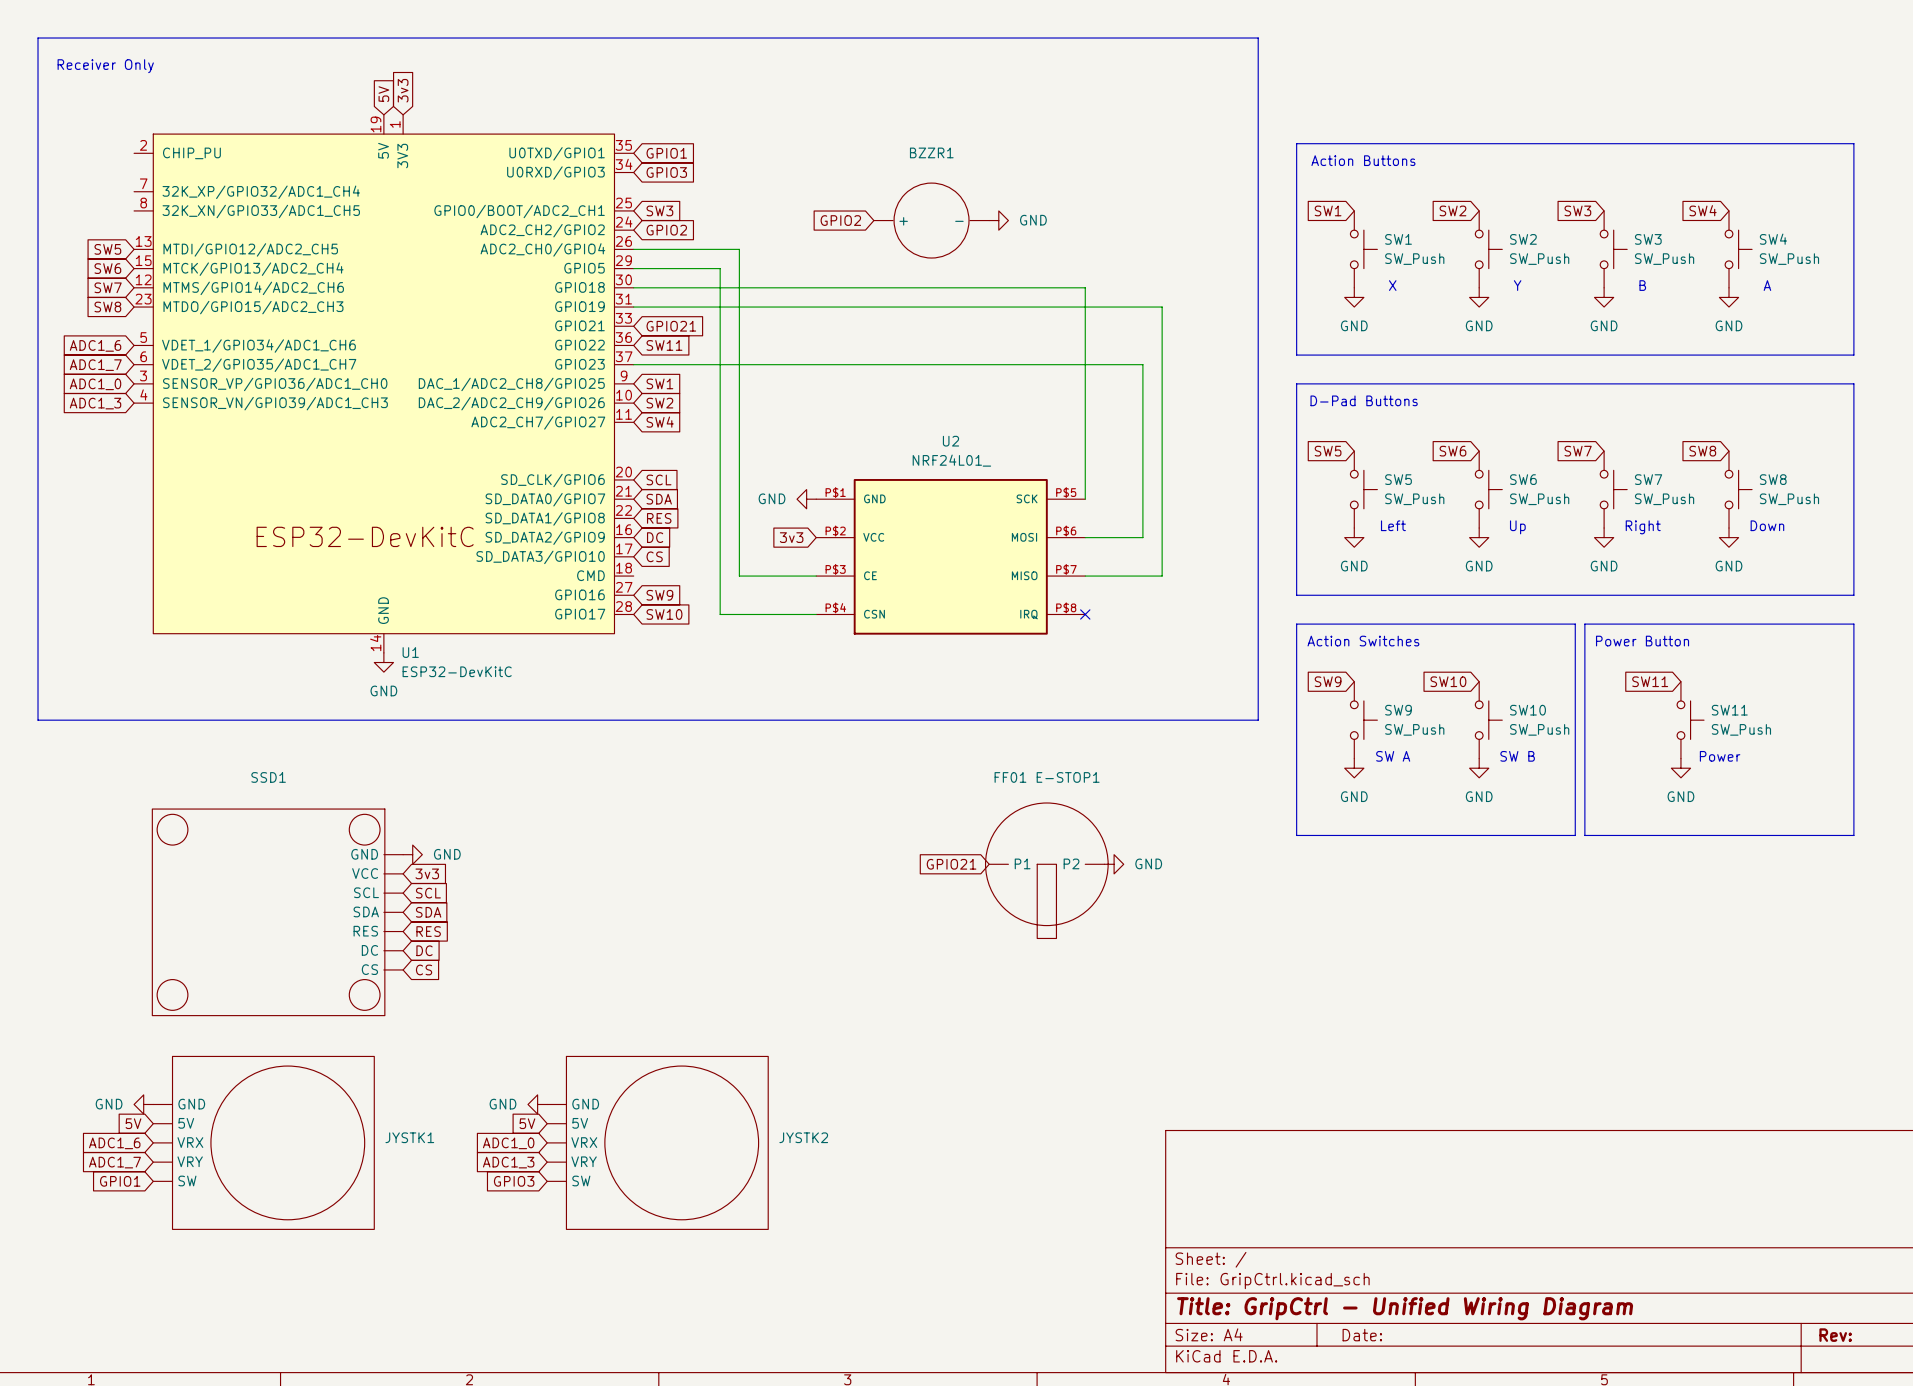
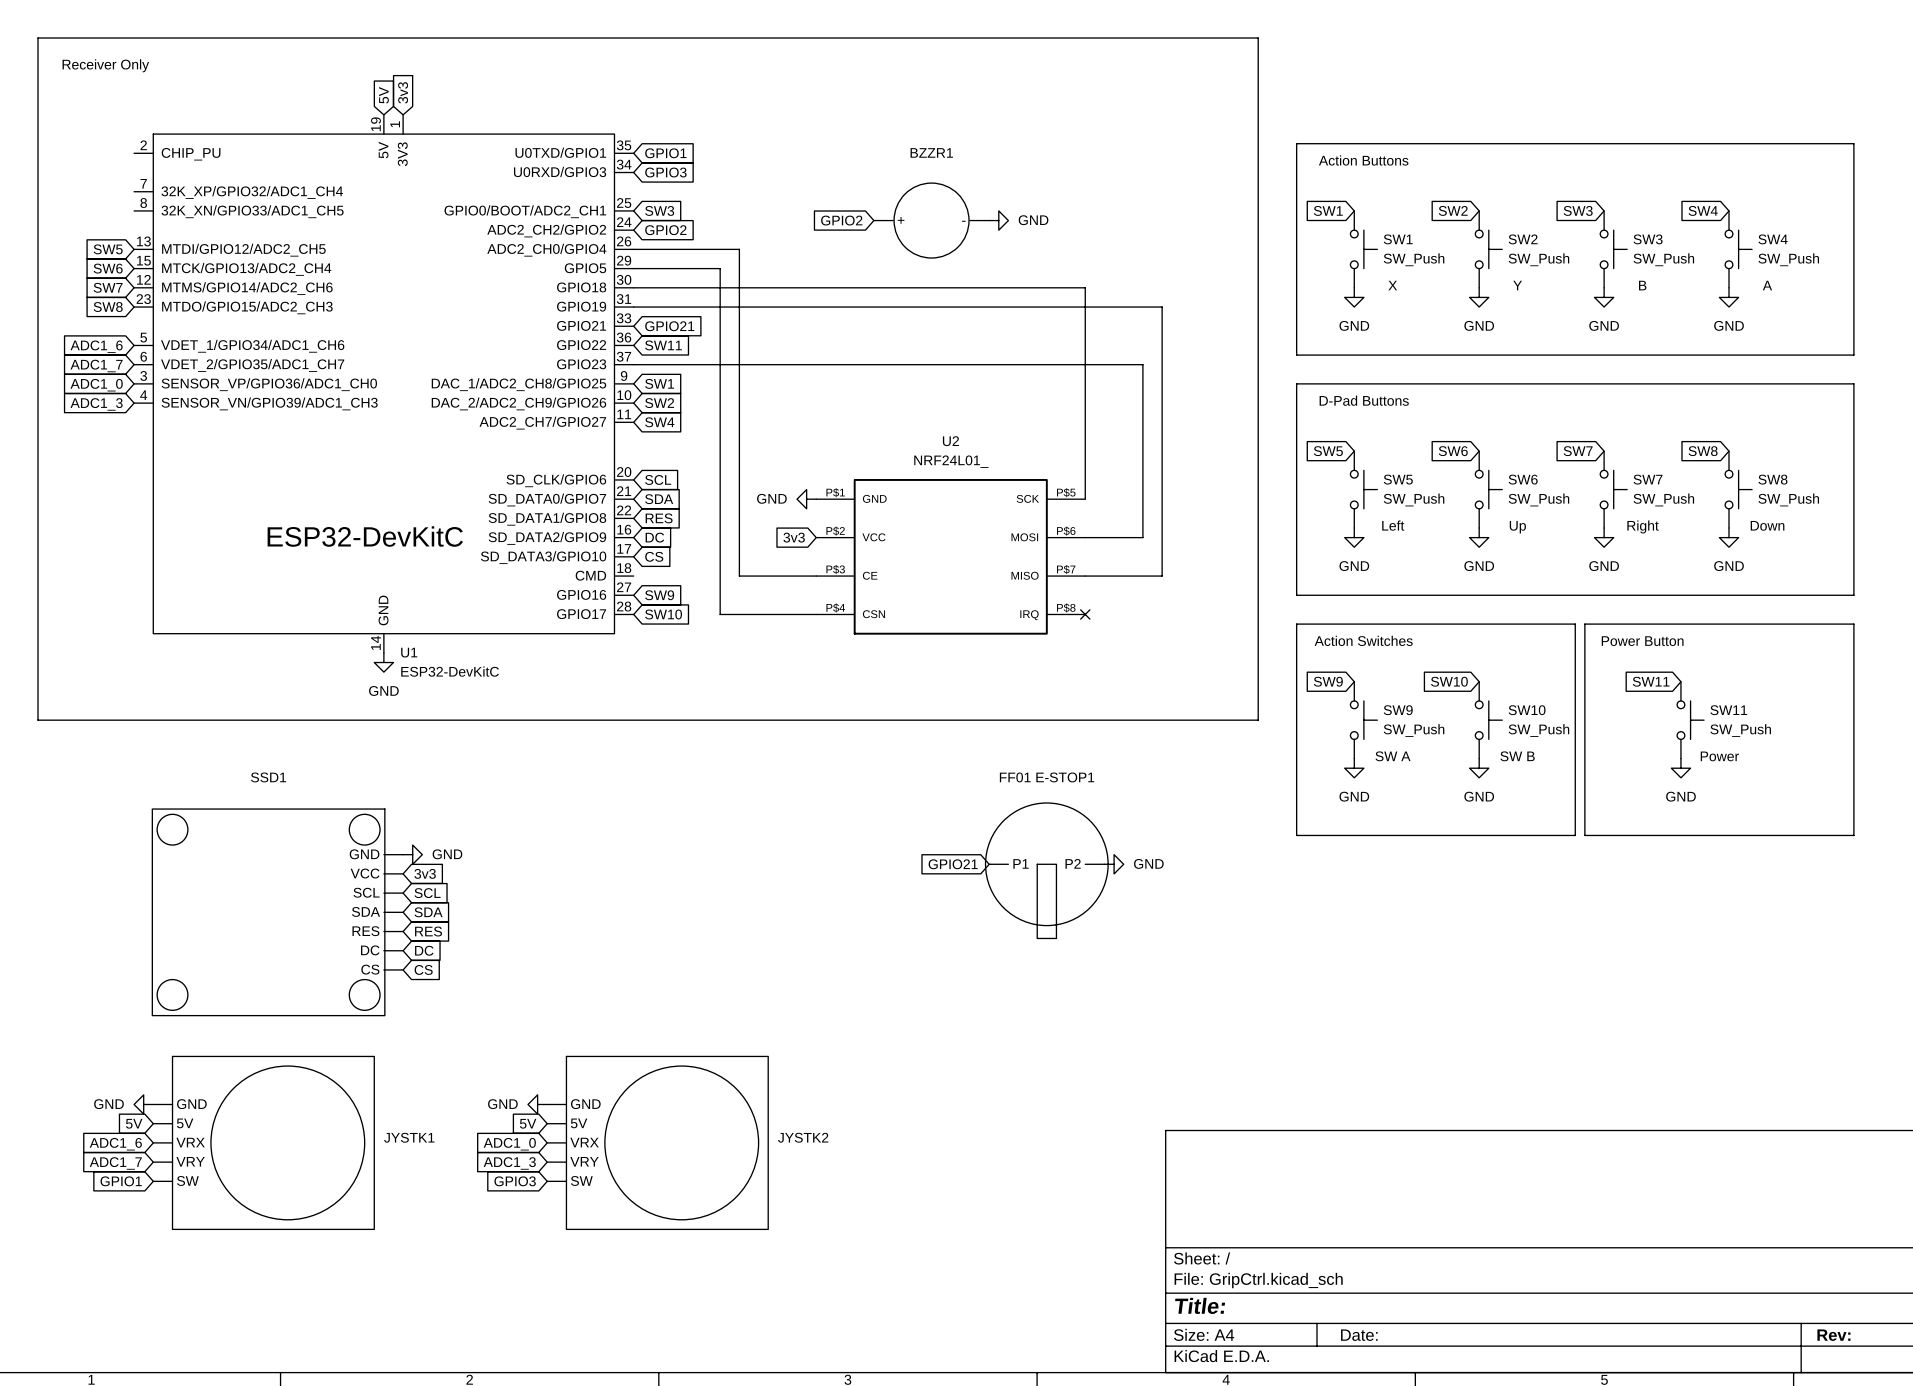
title block: Title: GripCtrl - Unified Wiring Diagram (1405, 1308) -> Title: (1200, 1305)

